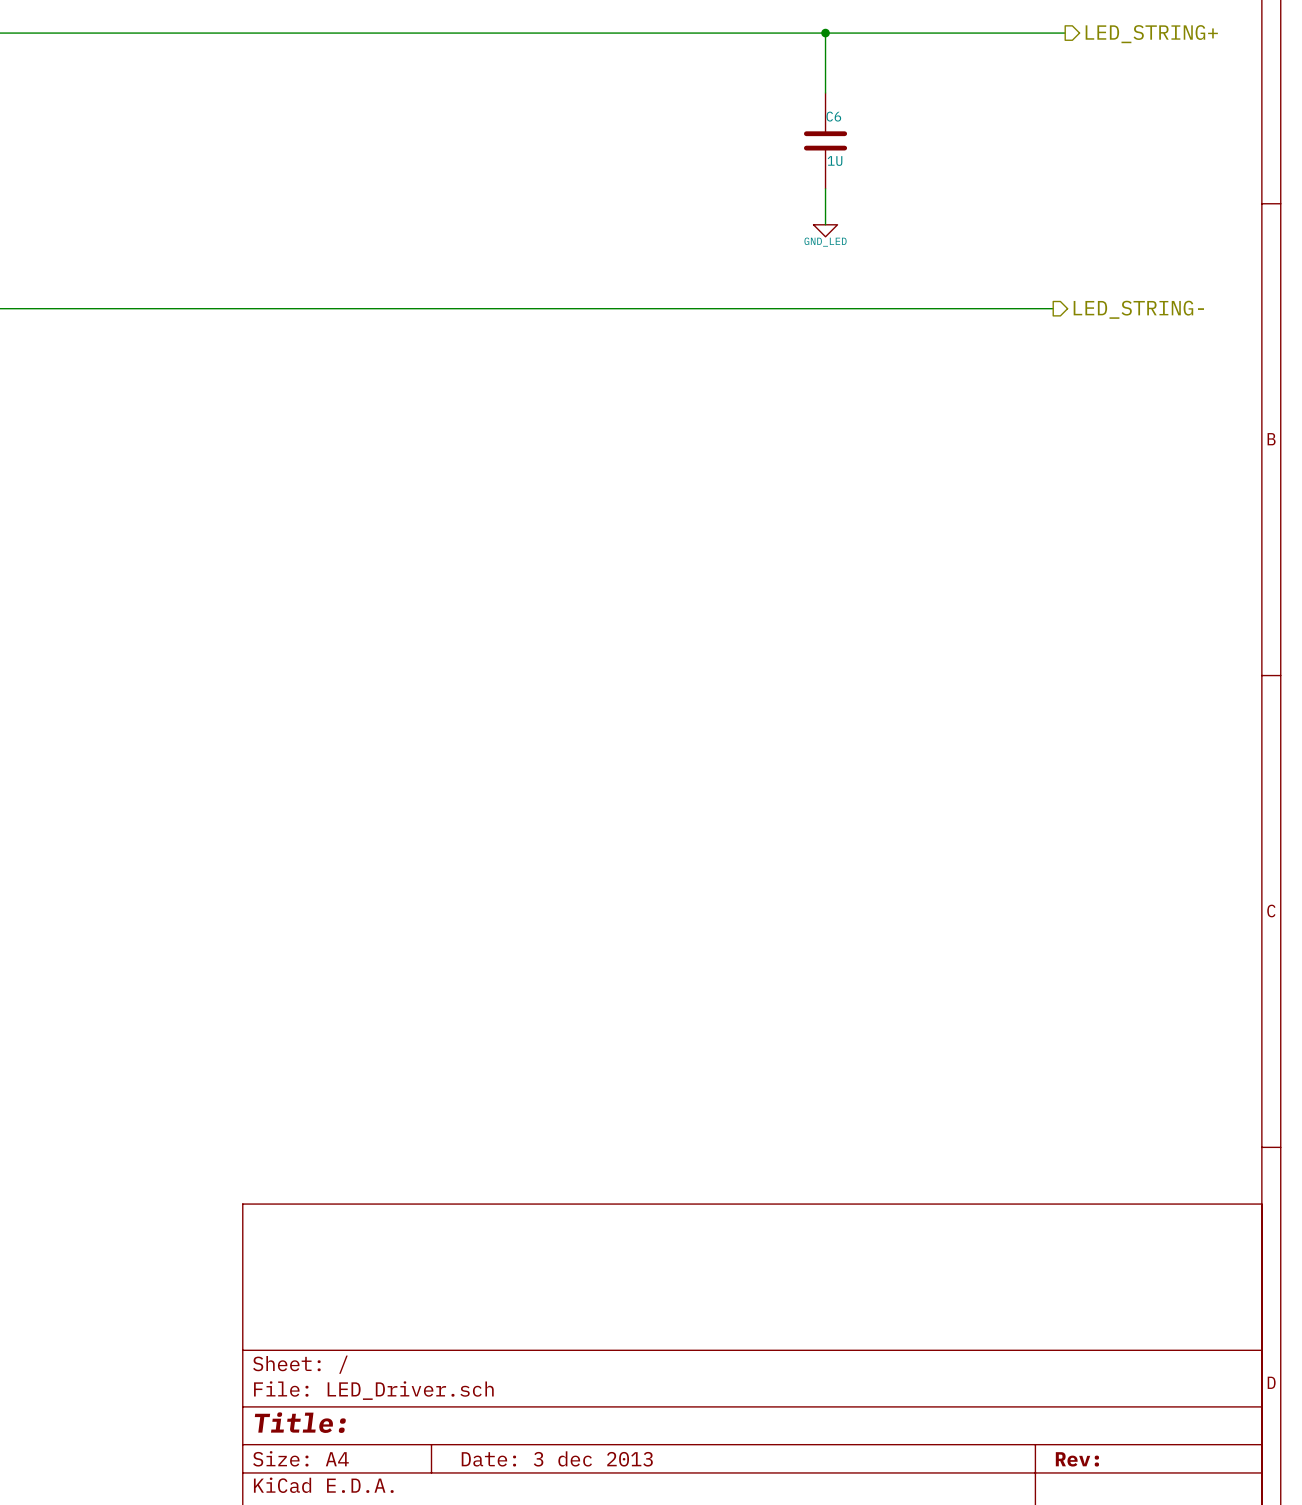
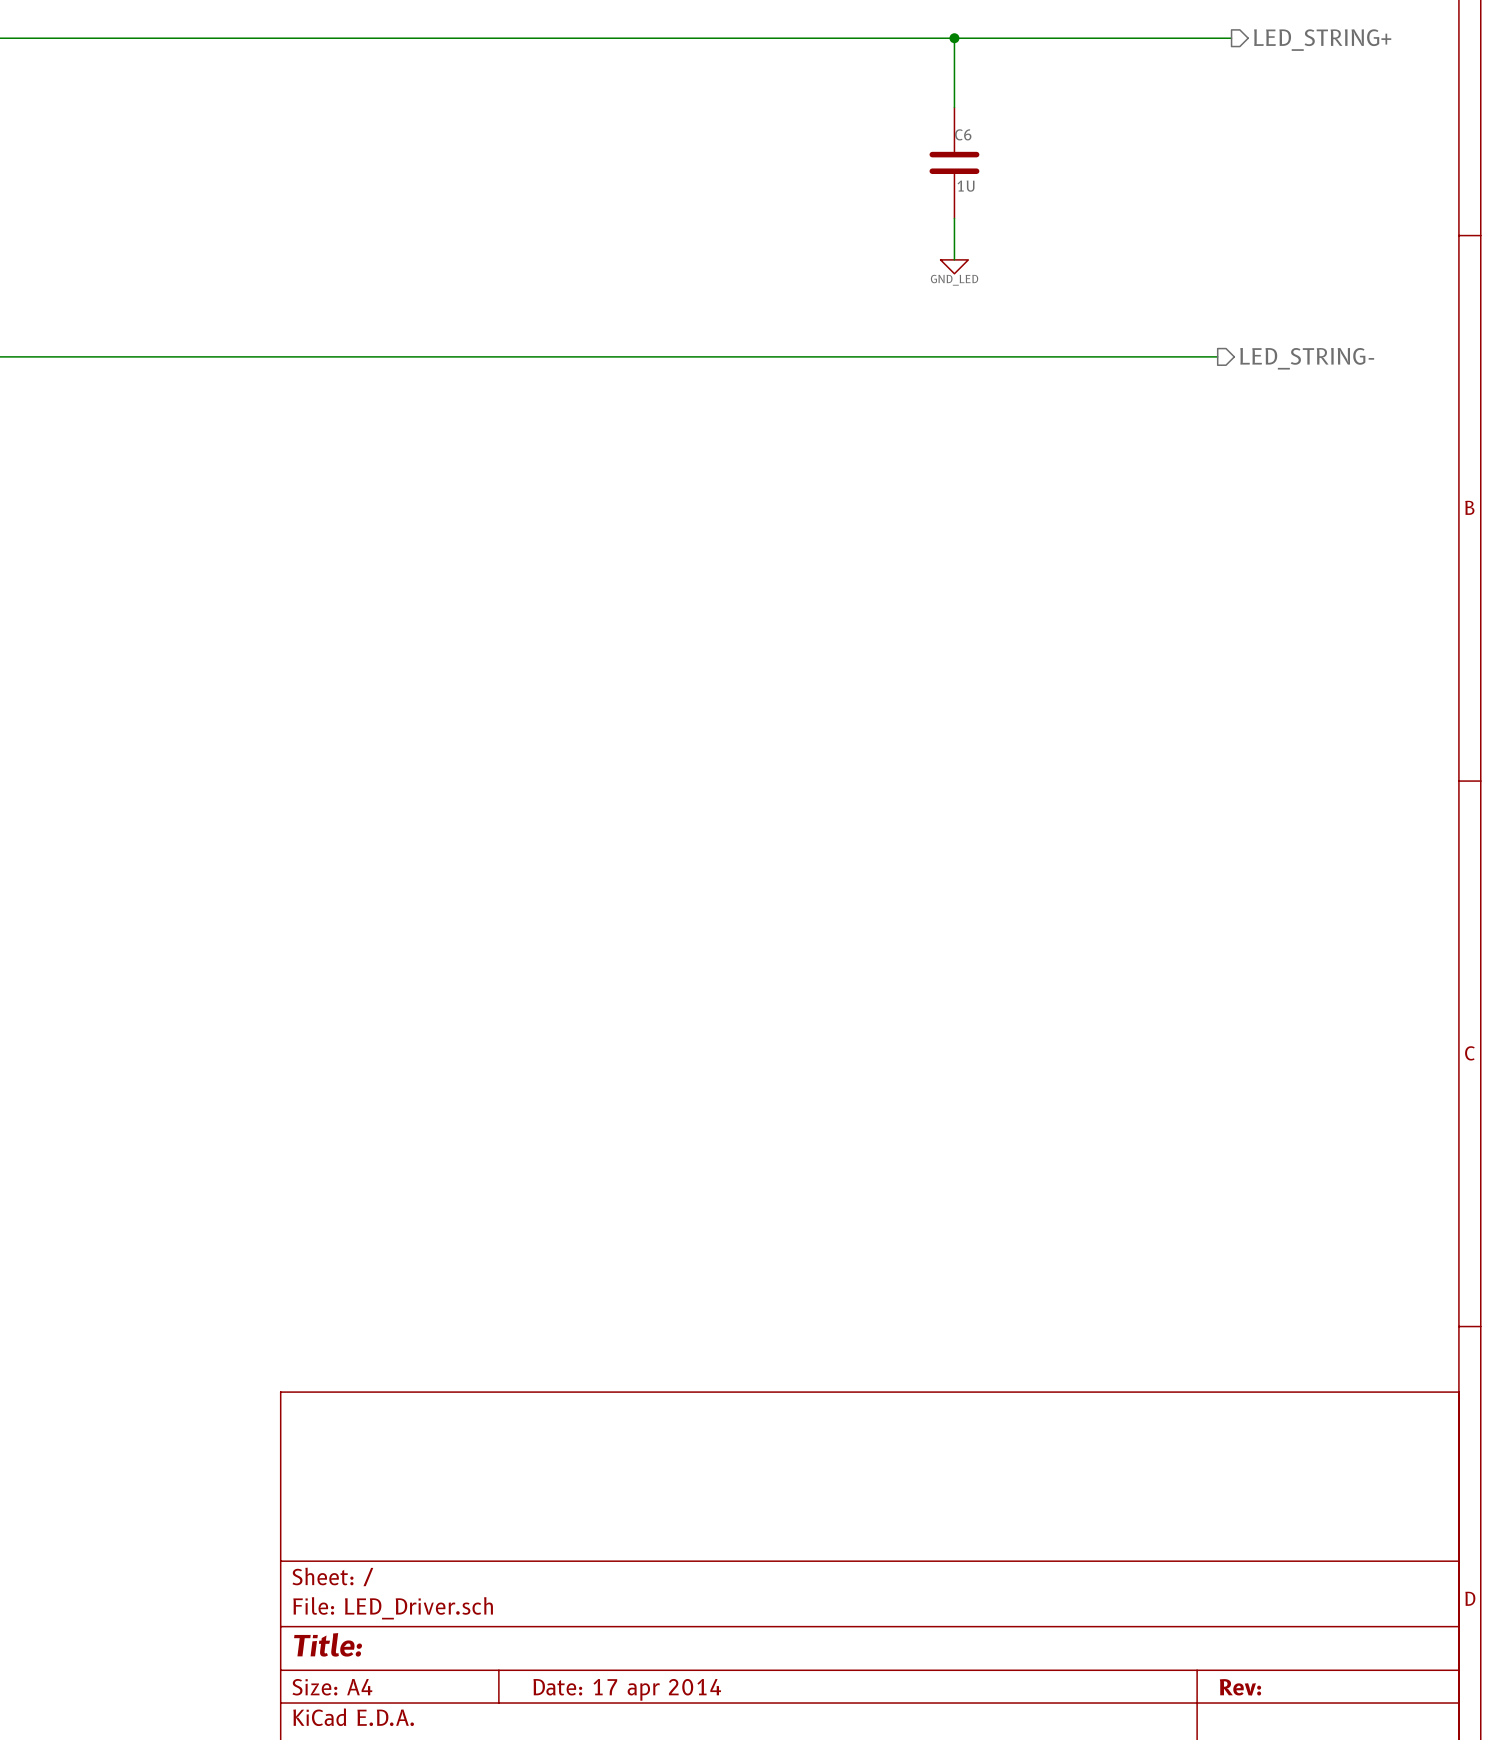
title block: Date: 3 dec 2013 (557, 1458) -> Date: 17 apr 2014 (627, 1689)

